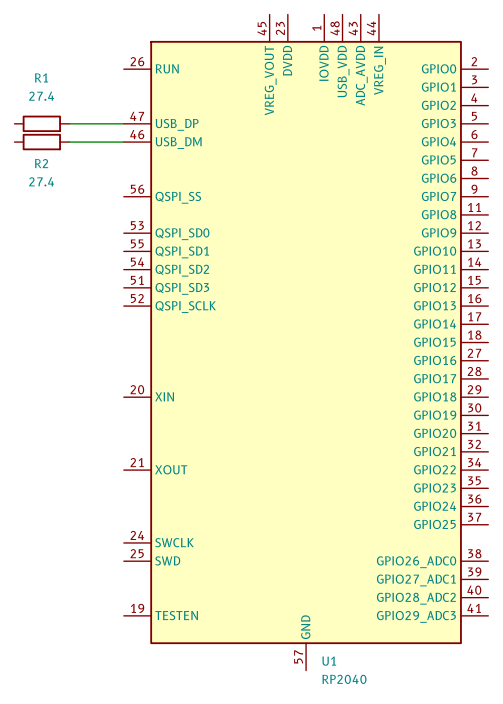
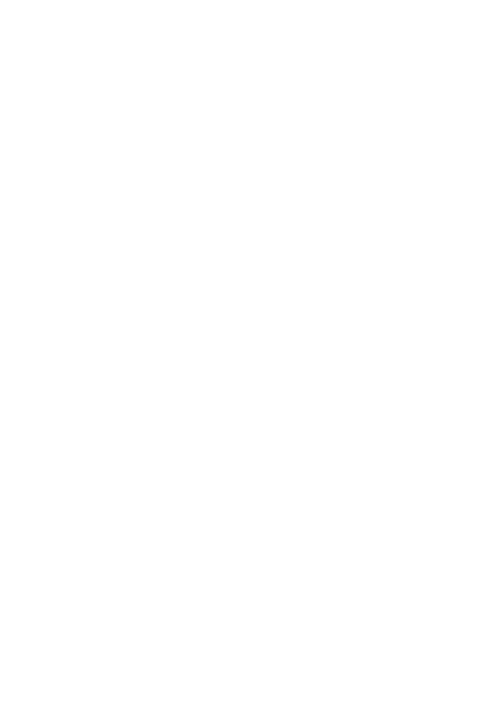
R1: 27.4 (41, 123) -> none
wire: (69, 123) (123, 123) -> none
R2: 27.4 (41, 142) -> none
wire: (69, 142) (123, 142) -> none
U1: RP2040 (306, 342) -> none

